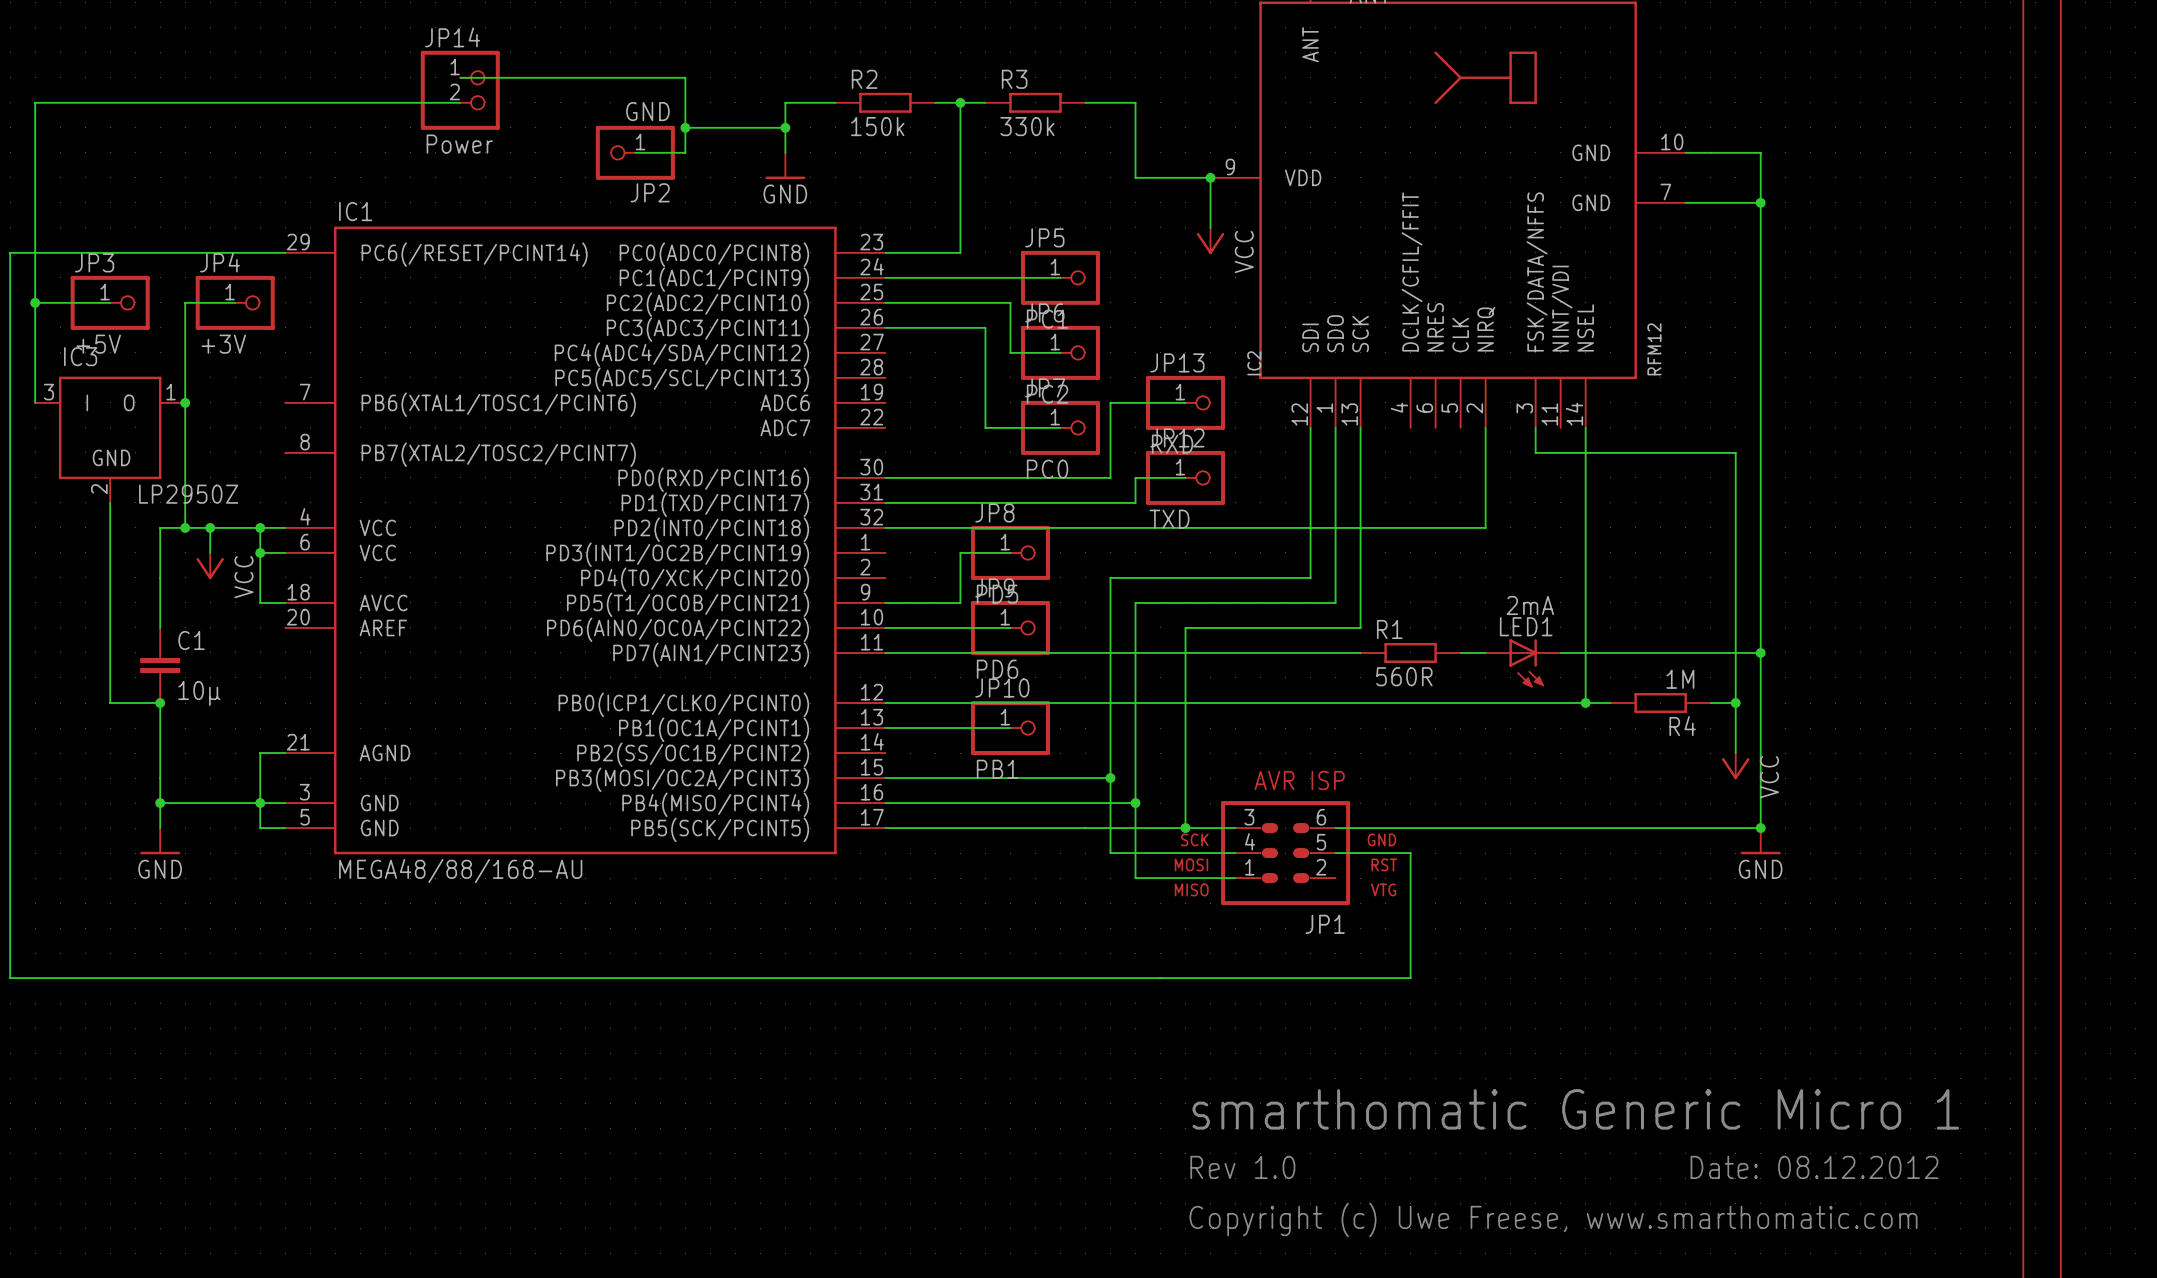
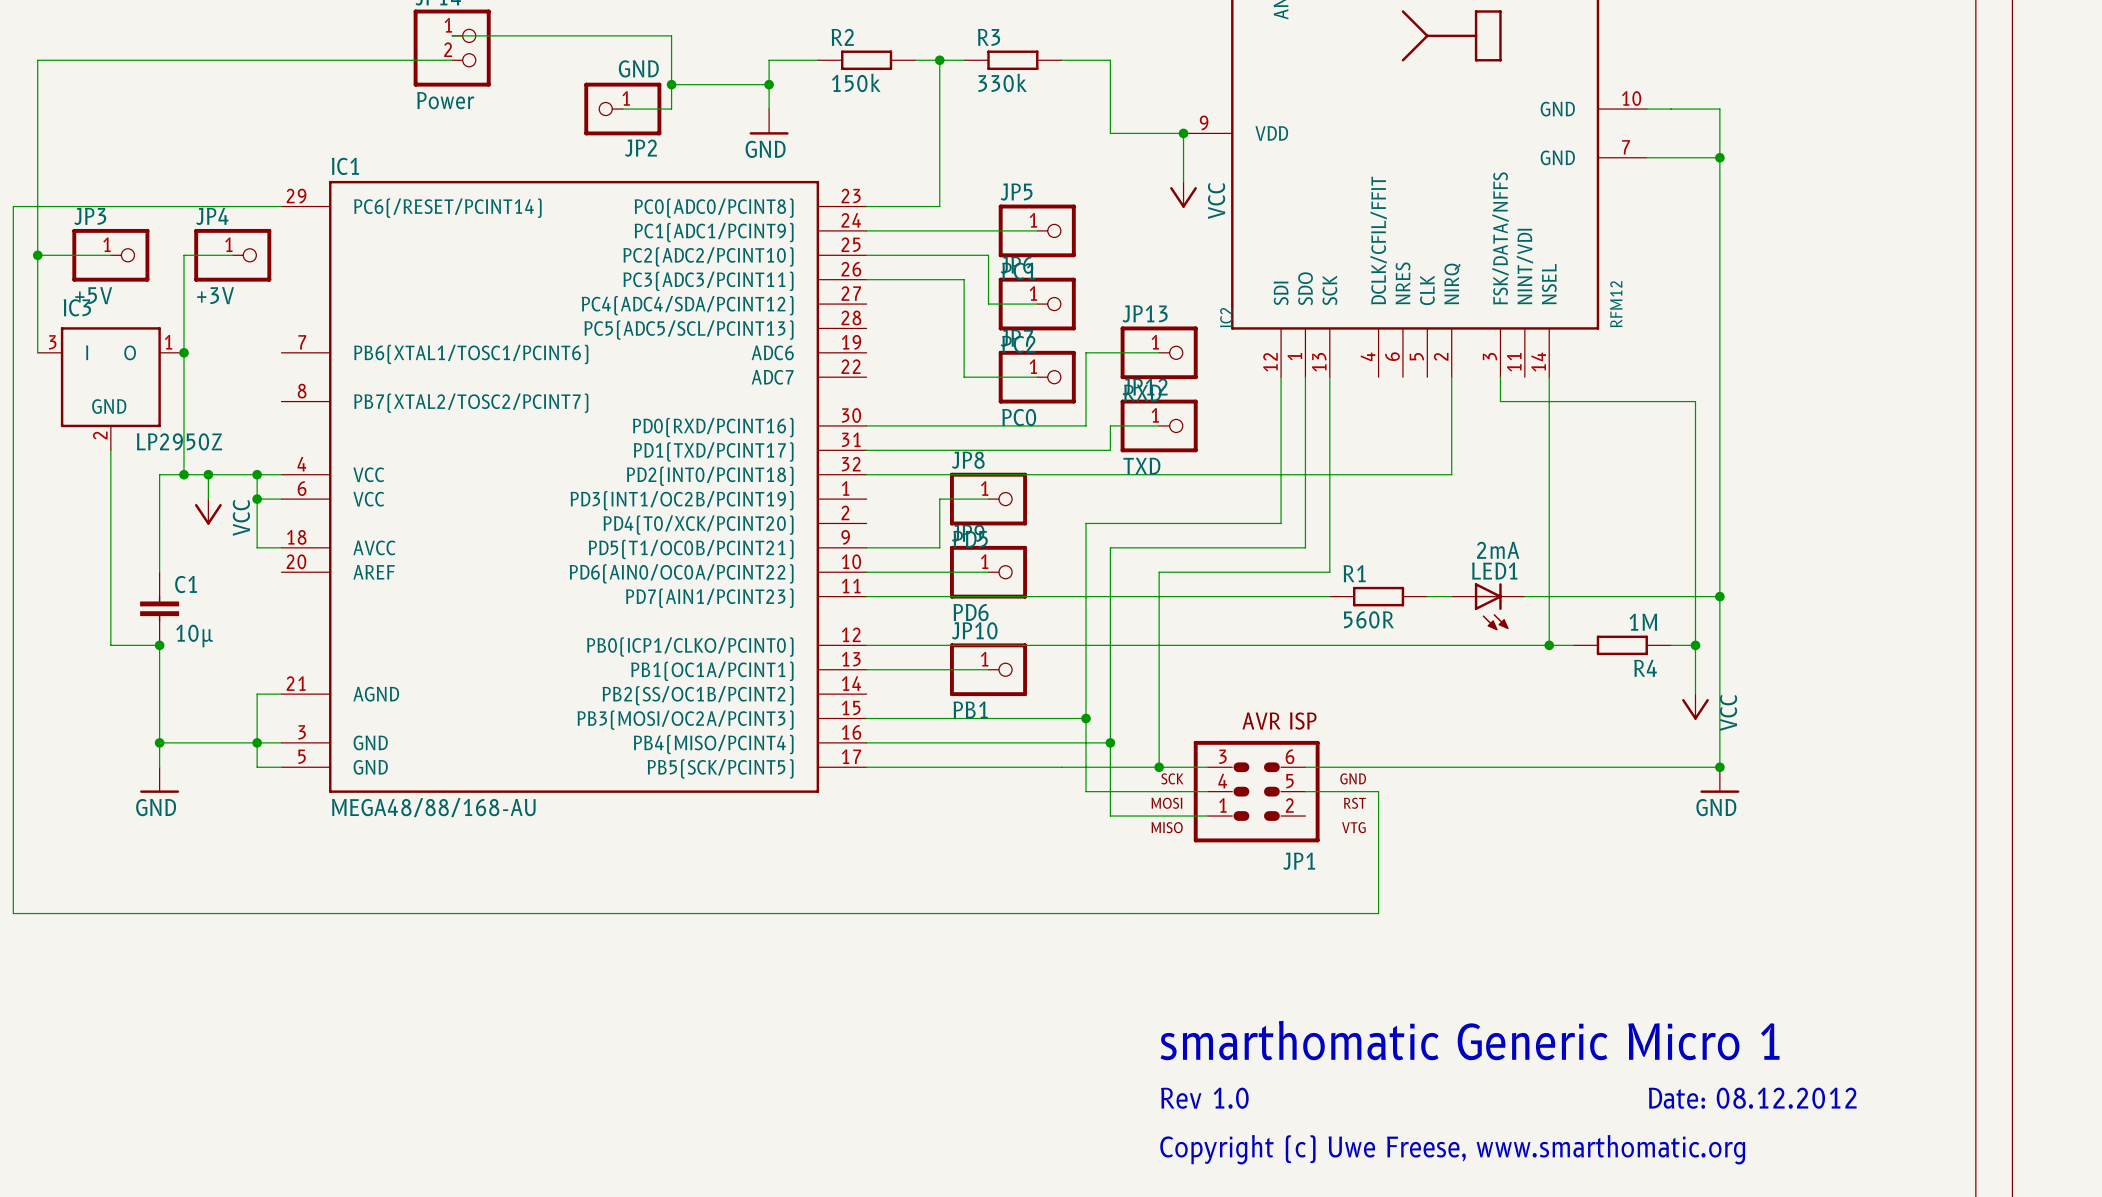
text: Copyright (c) Uwe Freese, www.smarthomatic.com (1553, 1219) -> Copyright (c) Uwe Freese, www.smarthomatic.org (1452, 1149)

